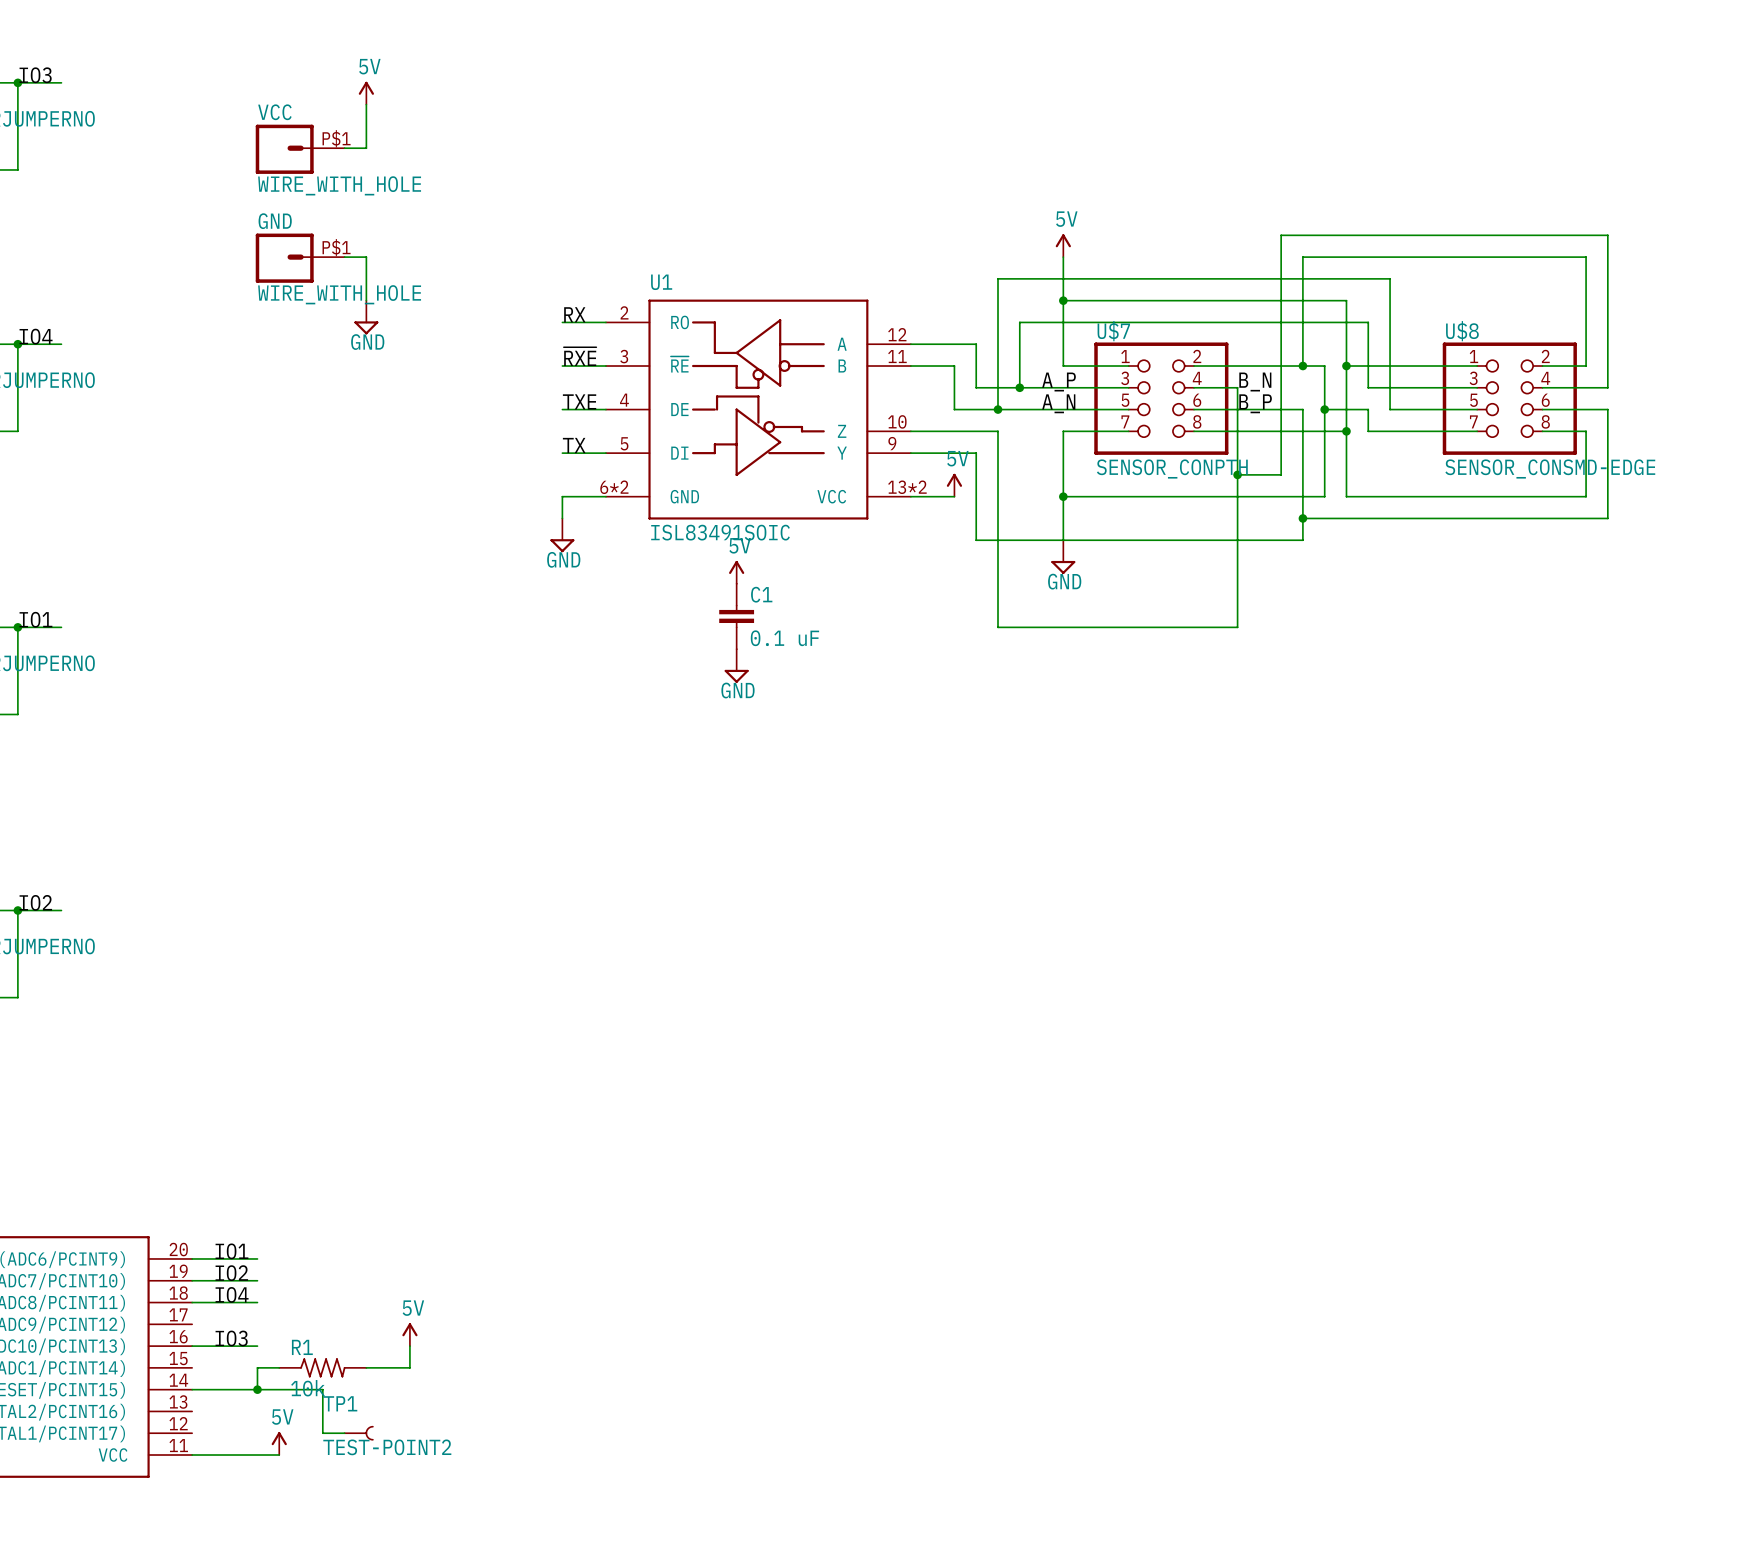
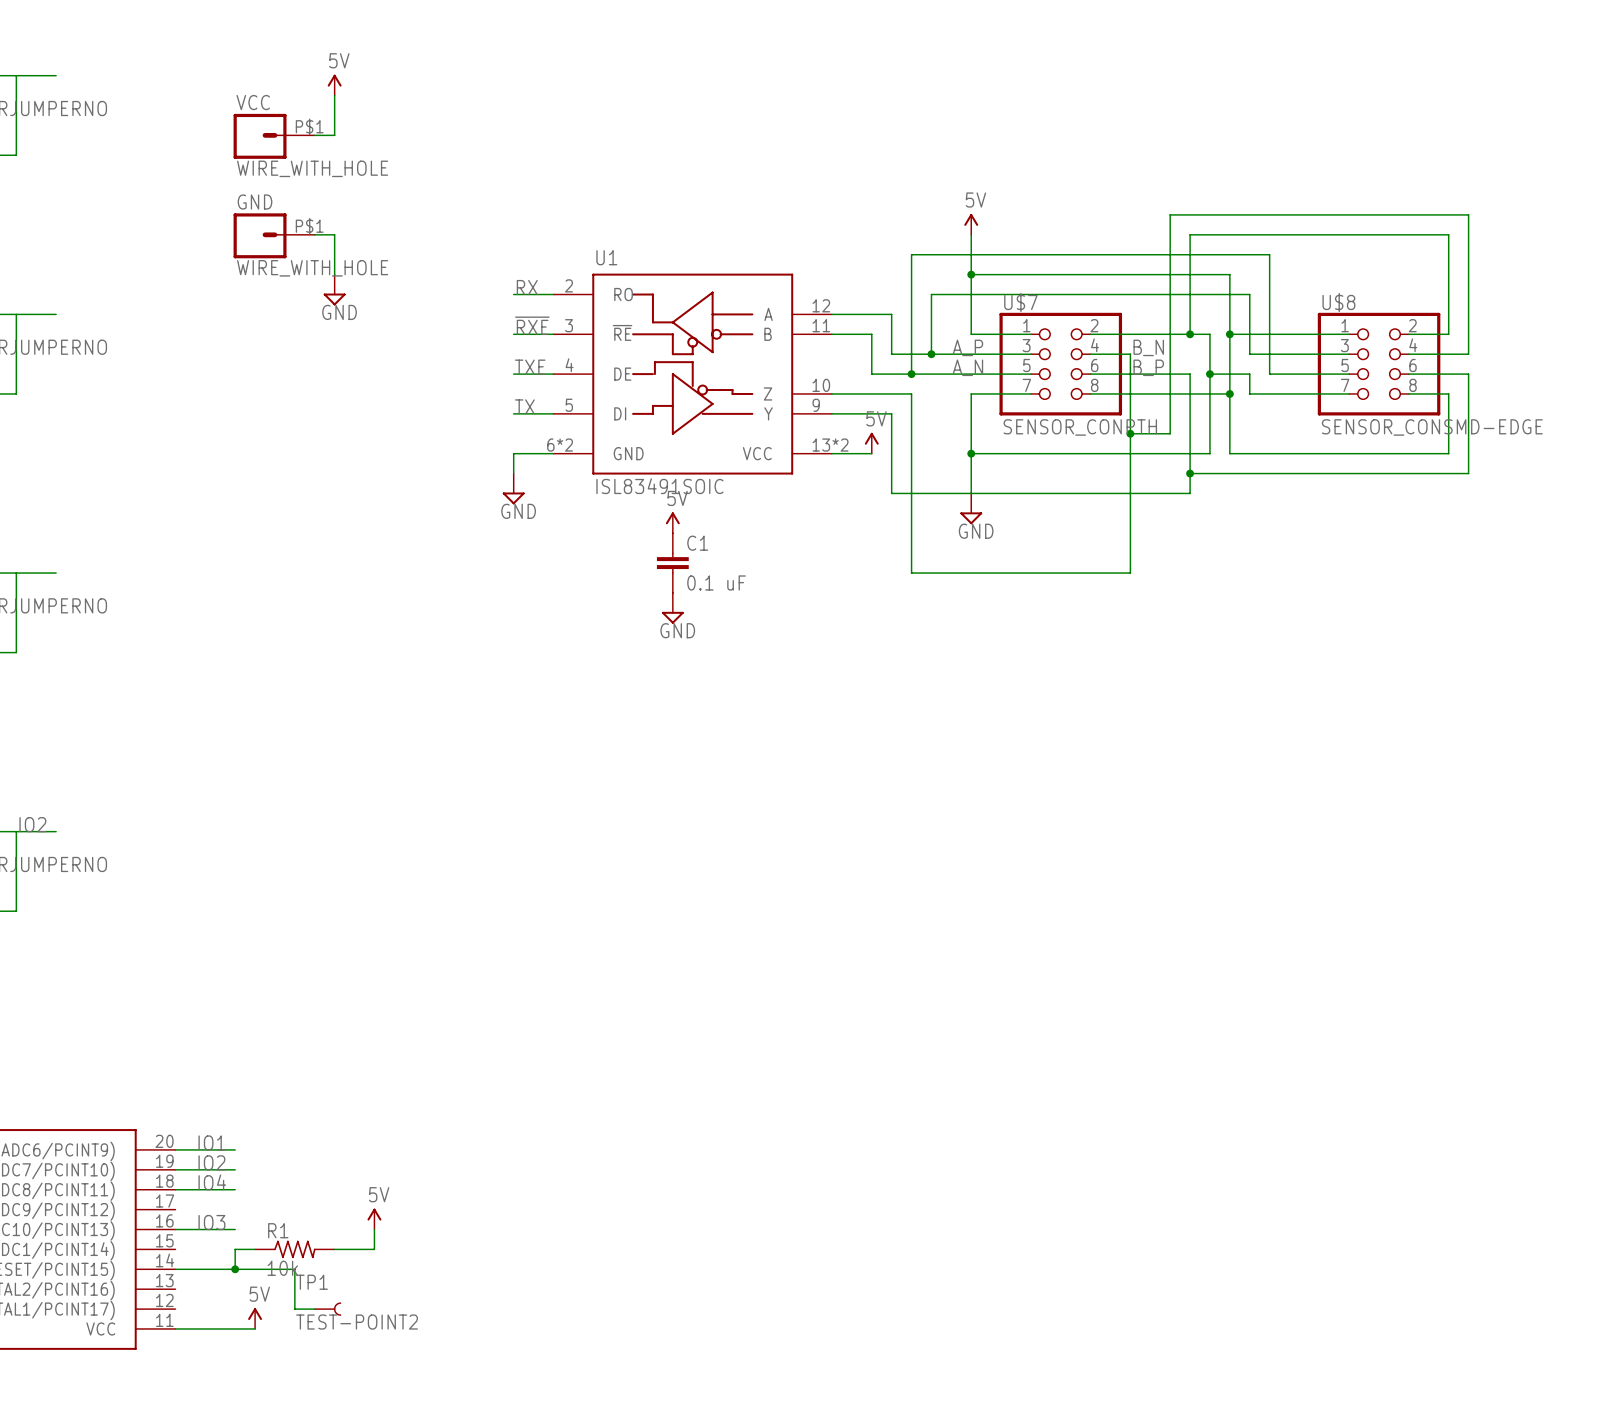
label: IO3 (35, 75) -> none
junction: (17, 82) -> none
label: IO4 (36, 336) -> none
junction: (17, 344) -> none
label: IO1 (35, 619) -> none
junction: (17, 627) -> none
junction: (17, 910) -> none

